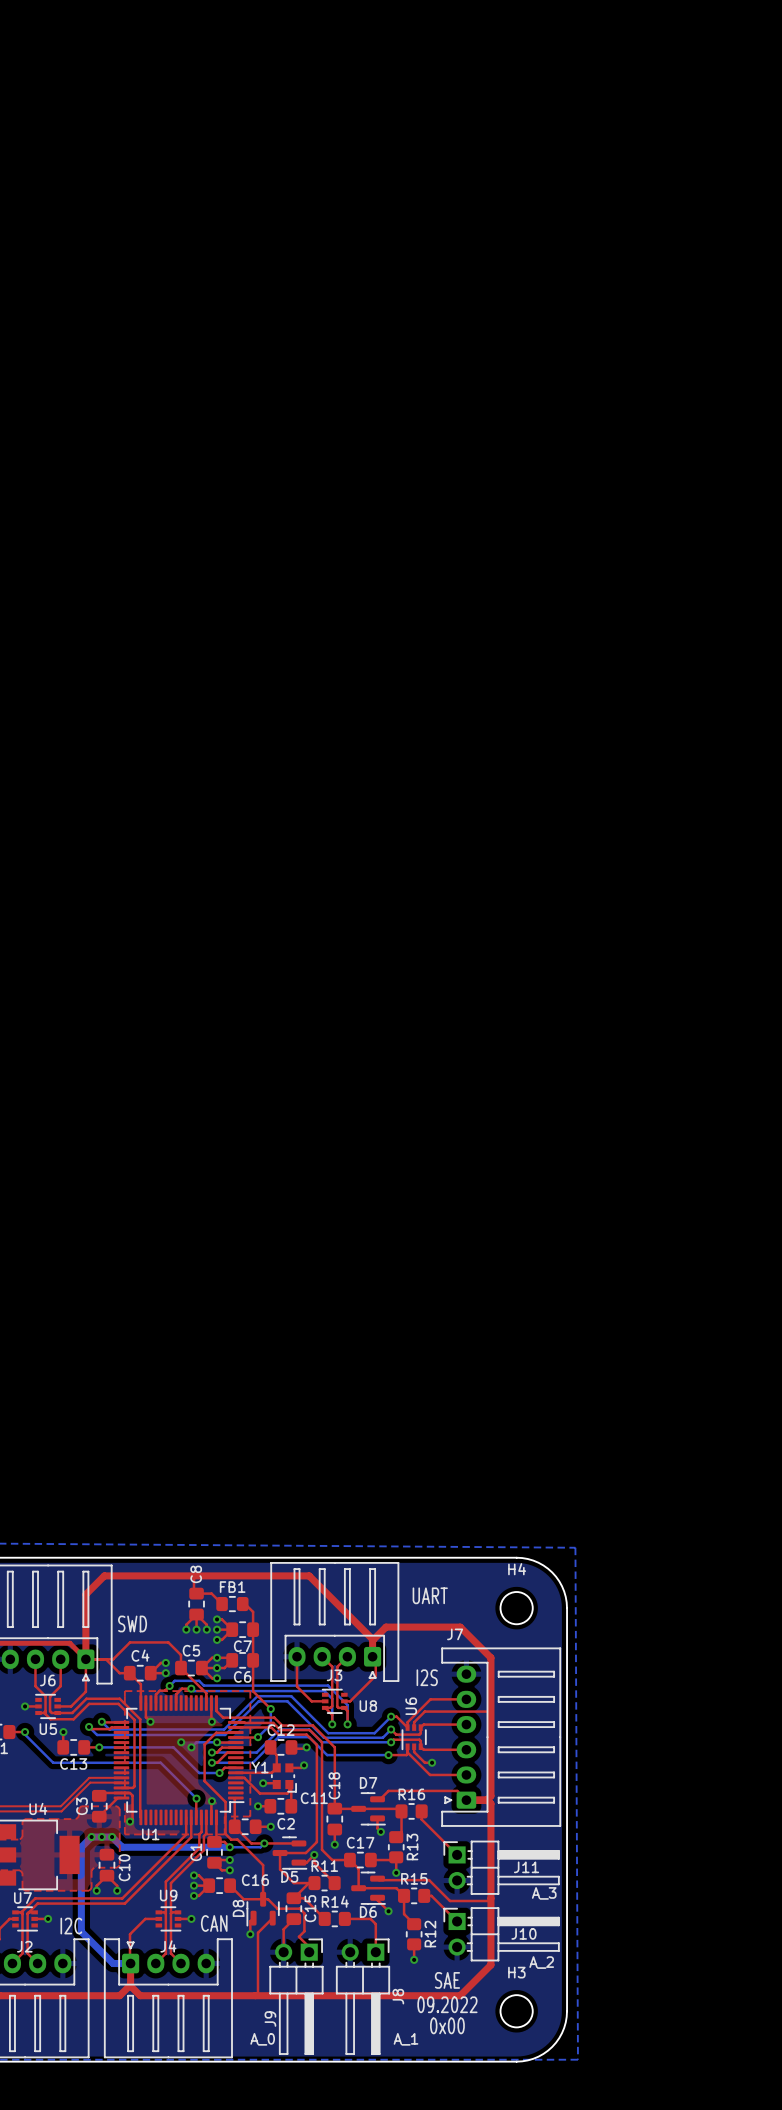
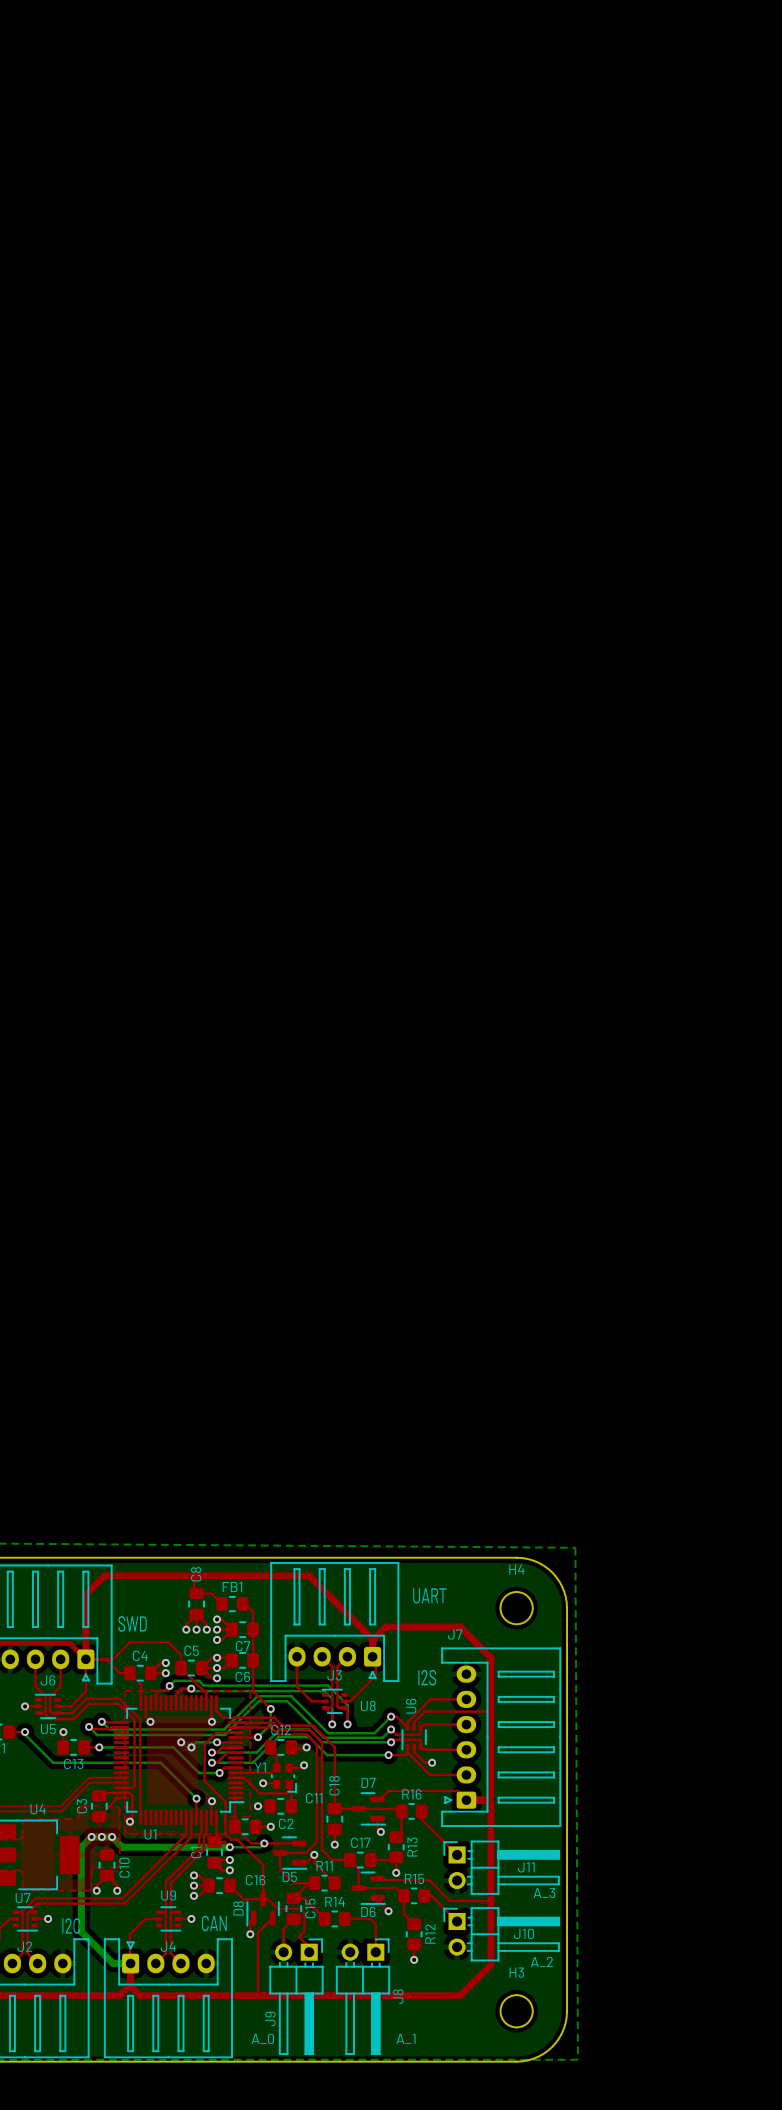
text: SAE (447, 1980) -> none
text: 09.2022 (447, 2004) -> none
text: 0x00 (447, 2025) -> none

